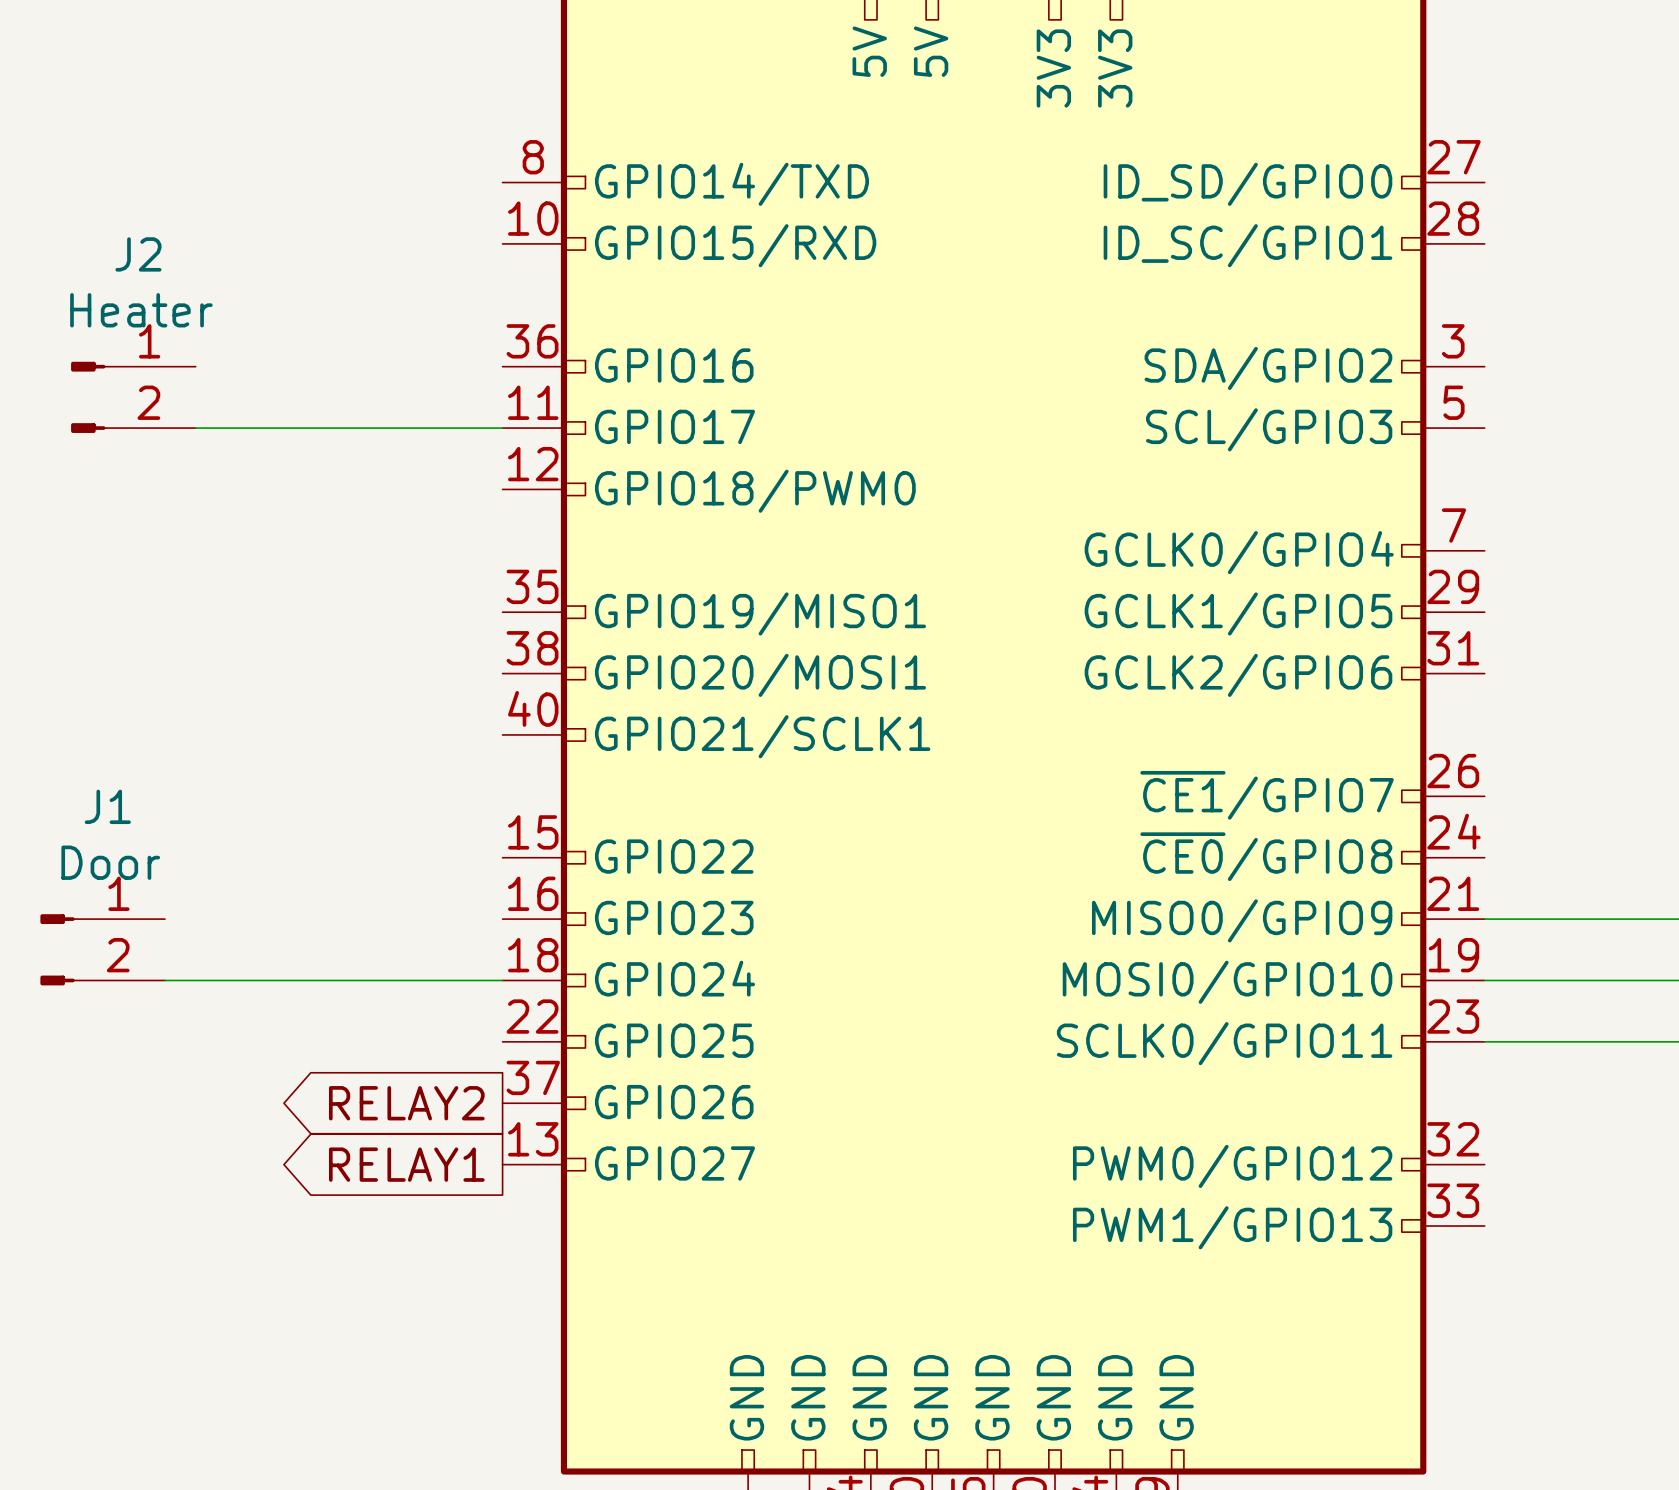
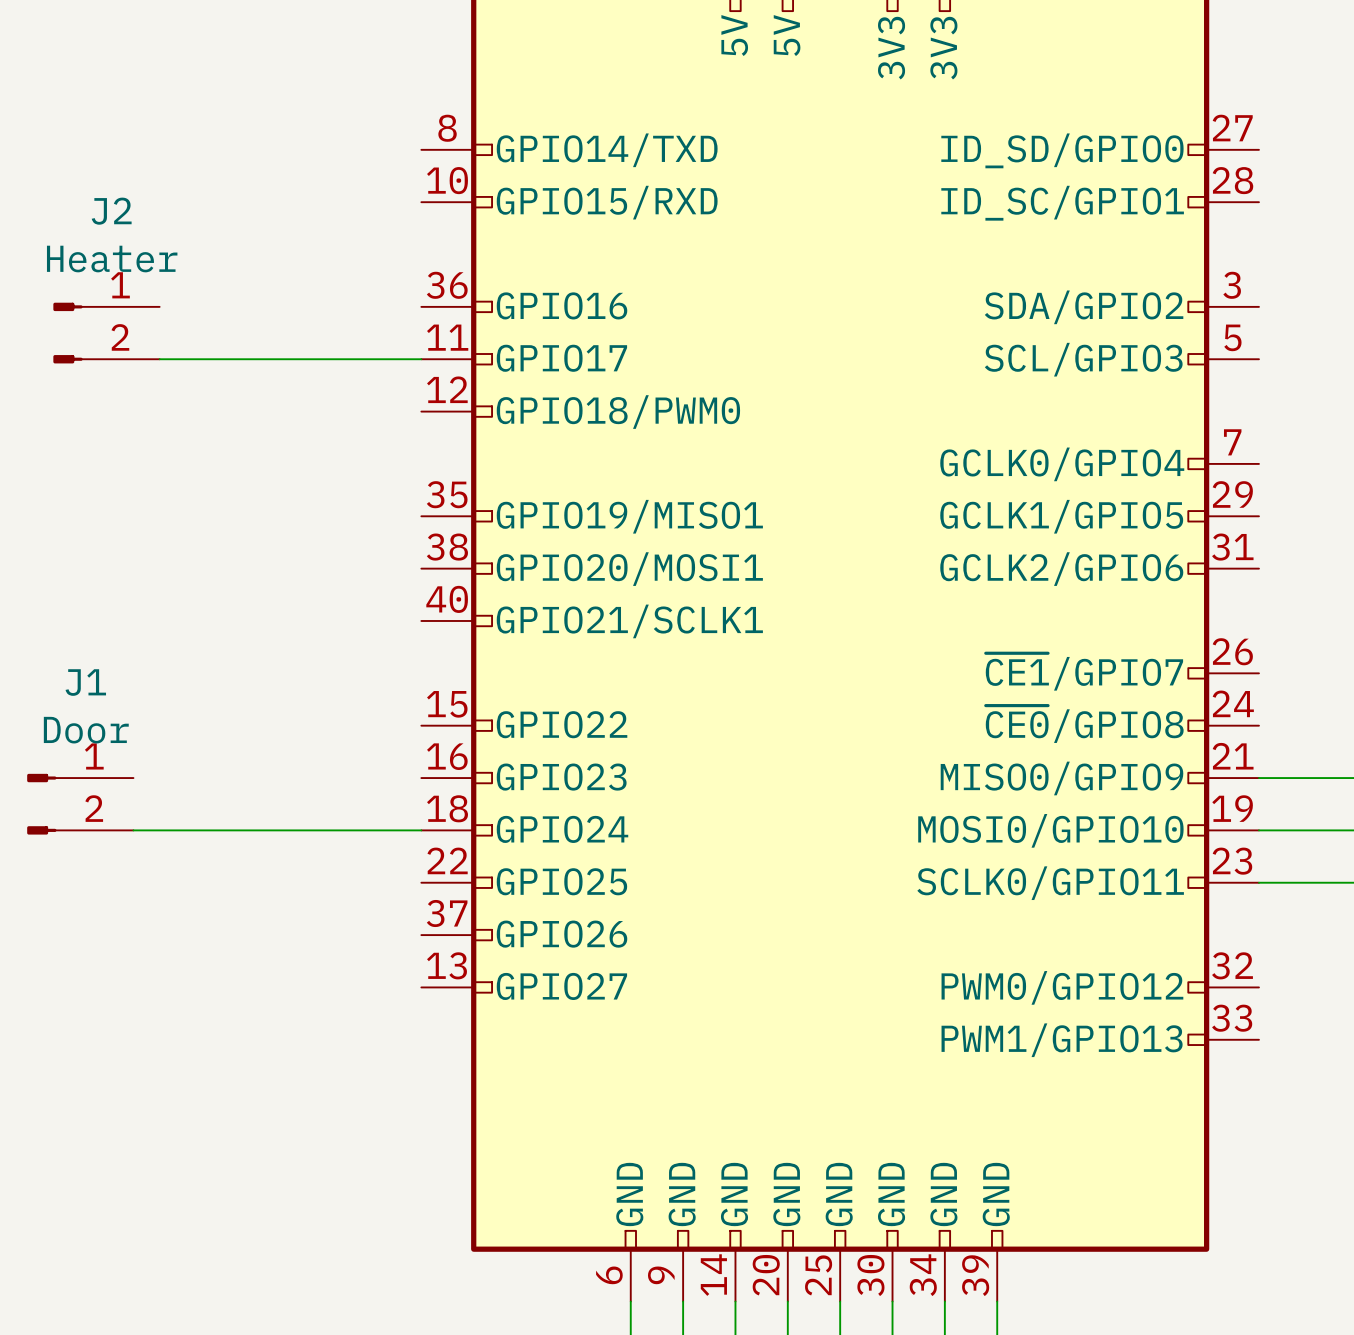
global label: RELAY2 (406, 1103) -> none
global label: RELAY1 (406, 1164) -> none

